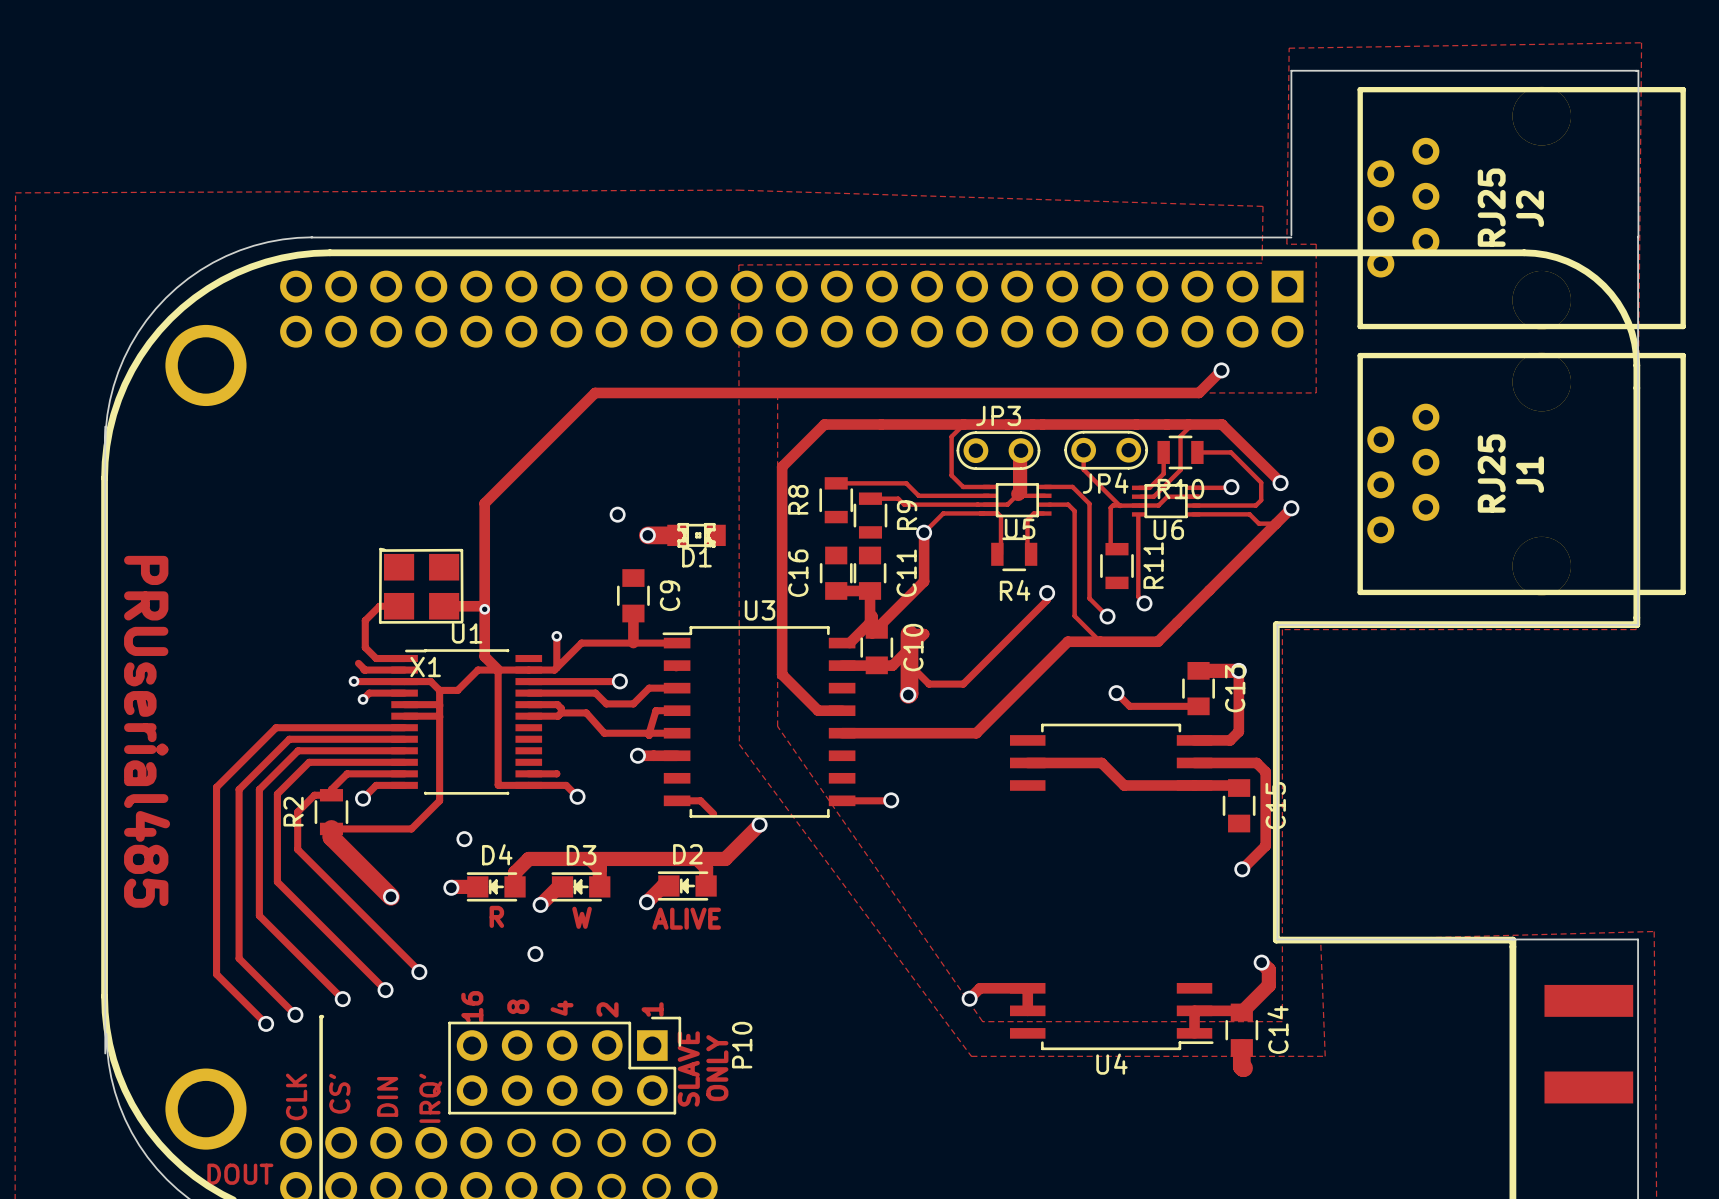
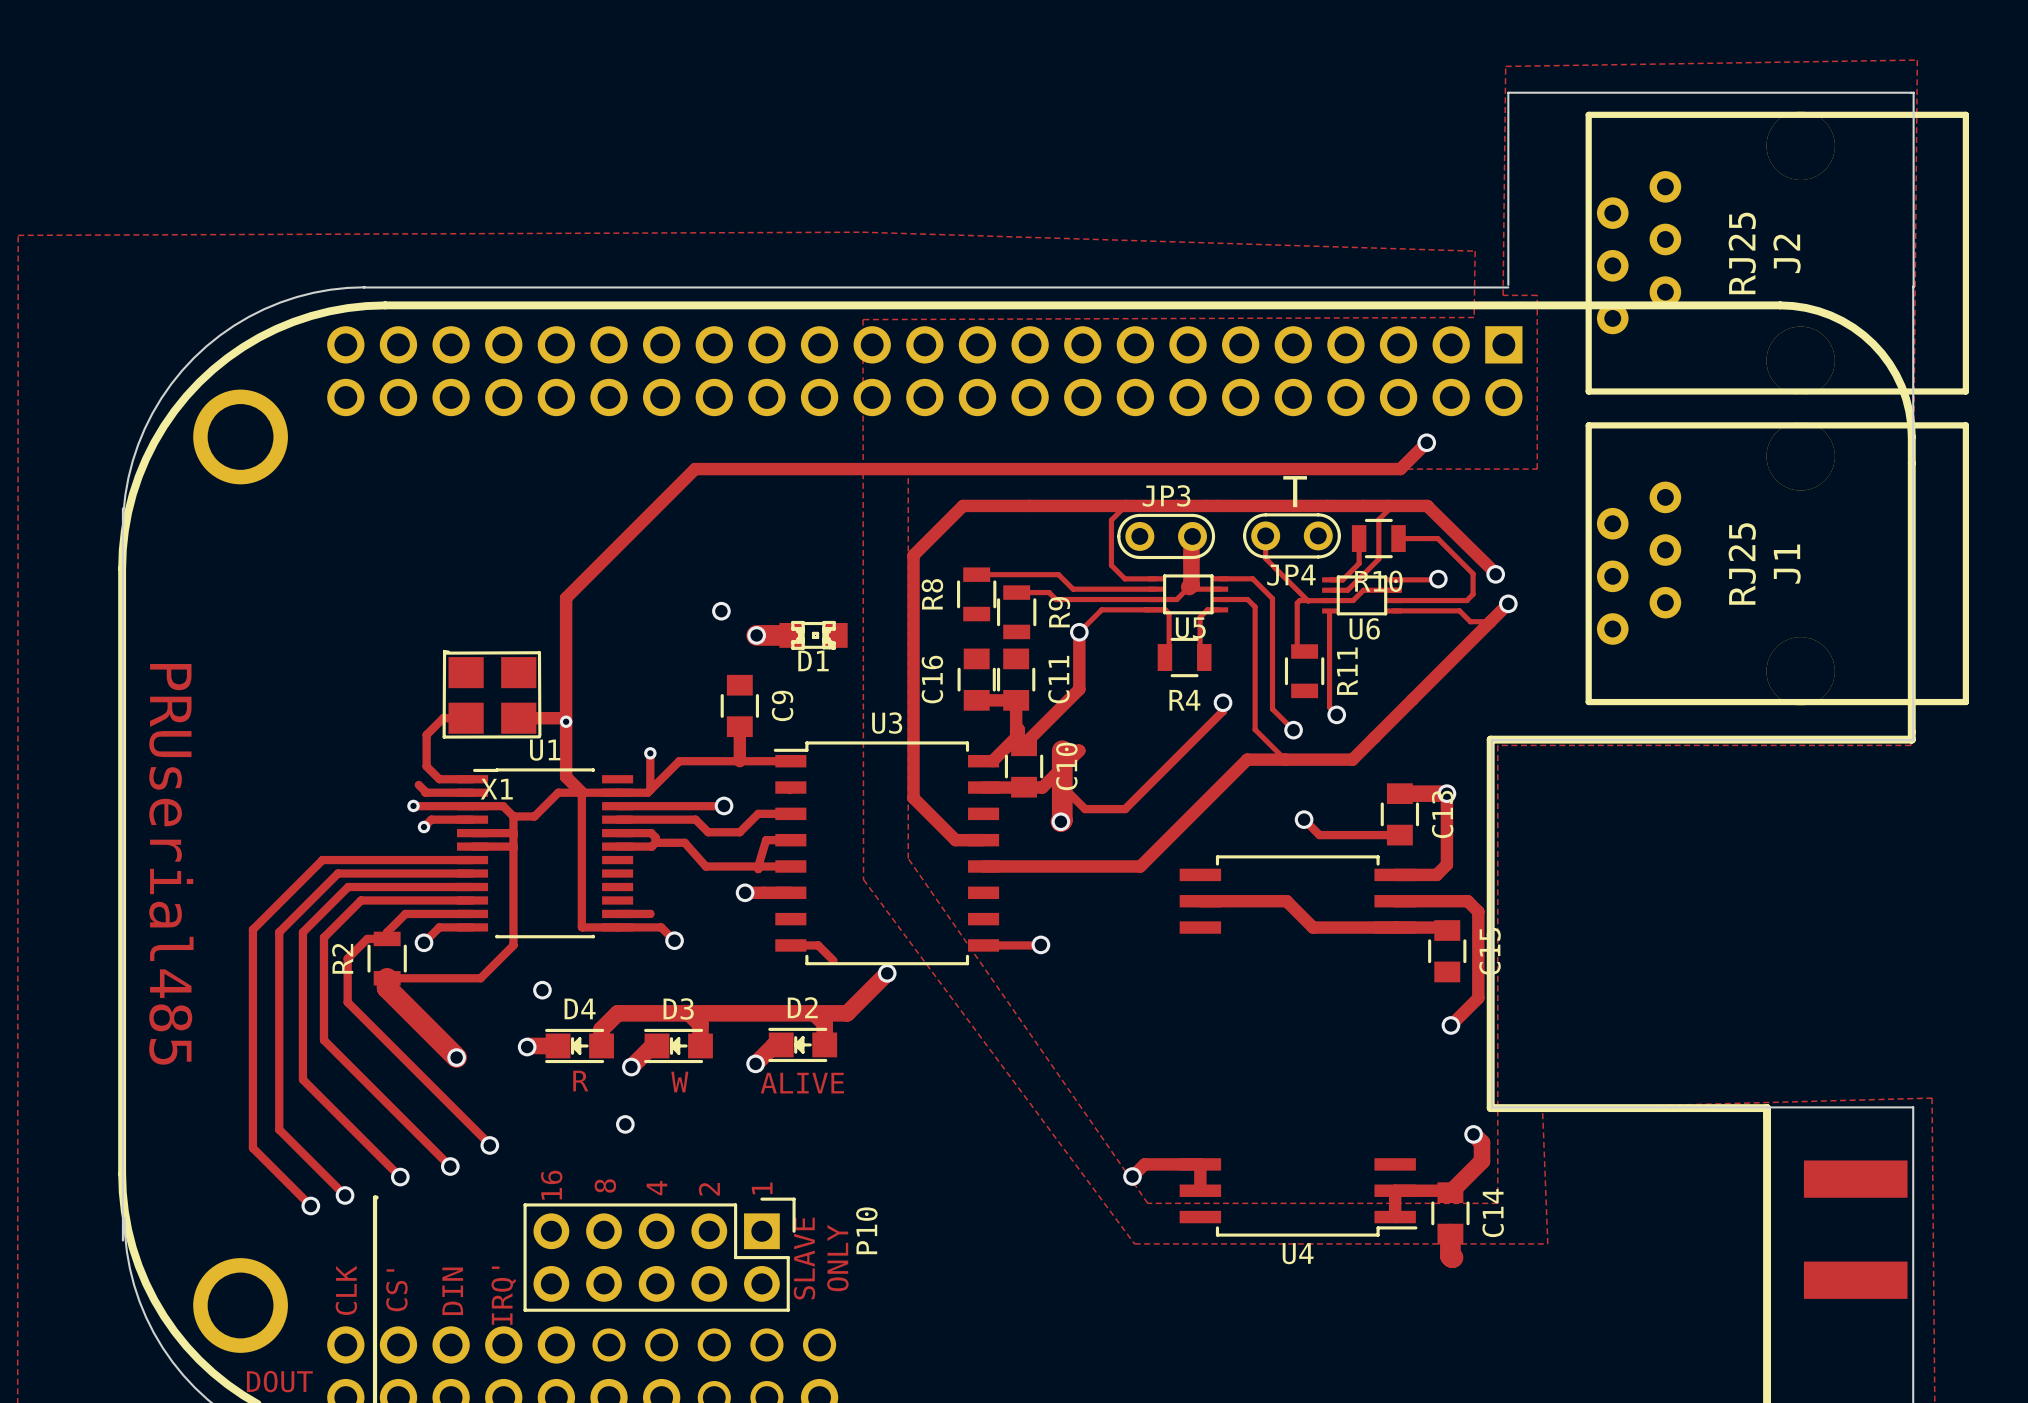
text: none -> T (1295, 491)

